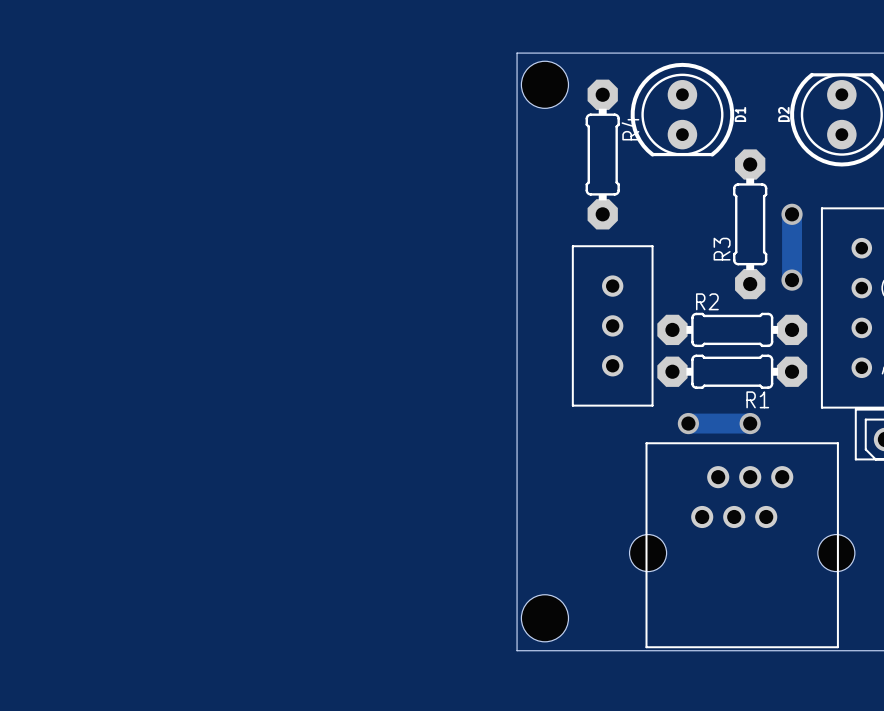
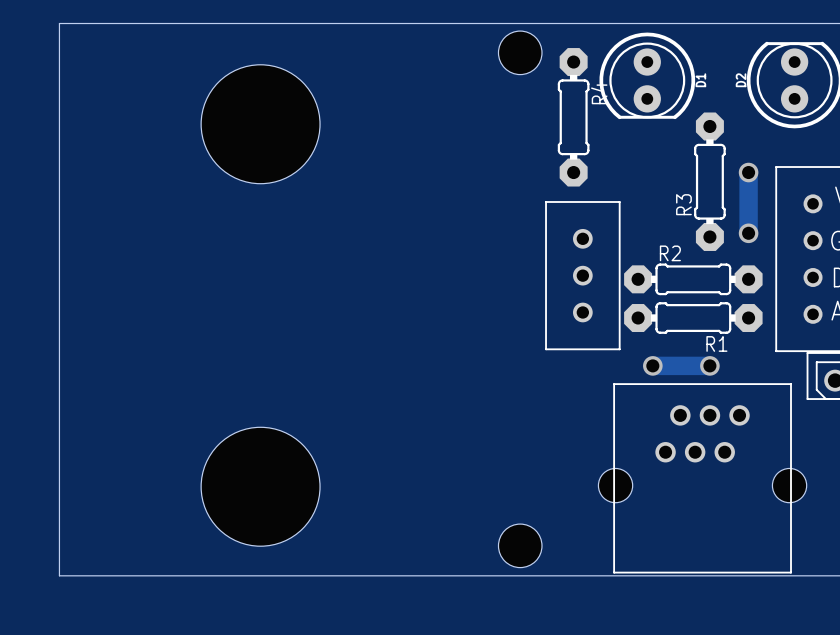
board edge: (517, 53) (517, 650) -> (494, 23) (59, 23) (59, 575) (494, 575)
hole: none -> (260, 124)
hole: none -> (260, 486)

